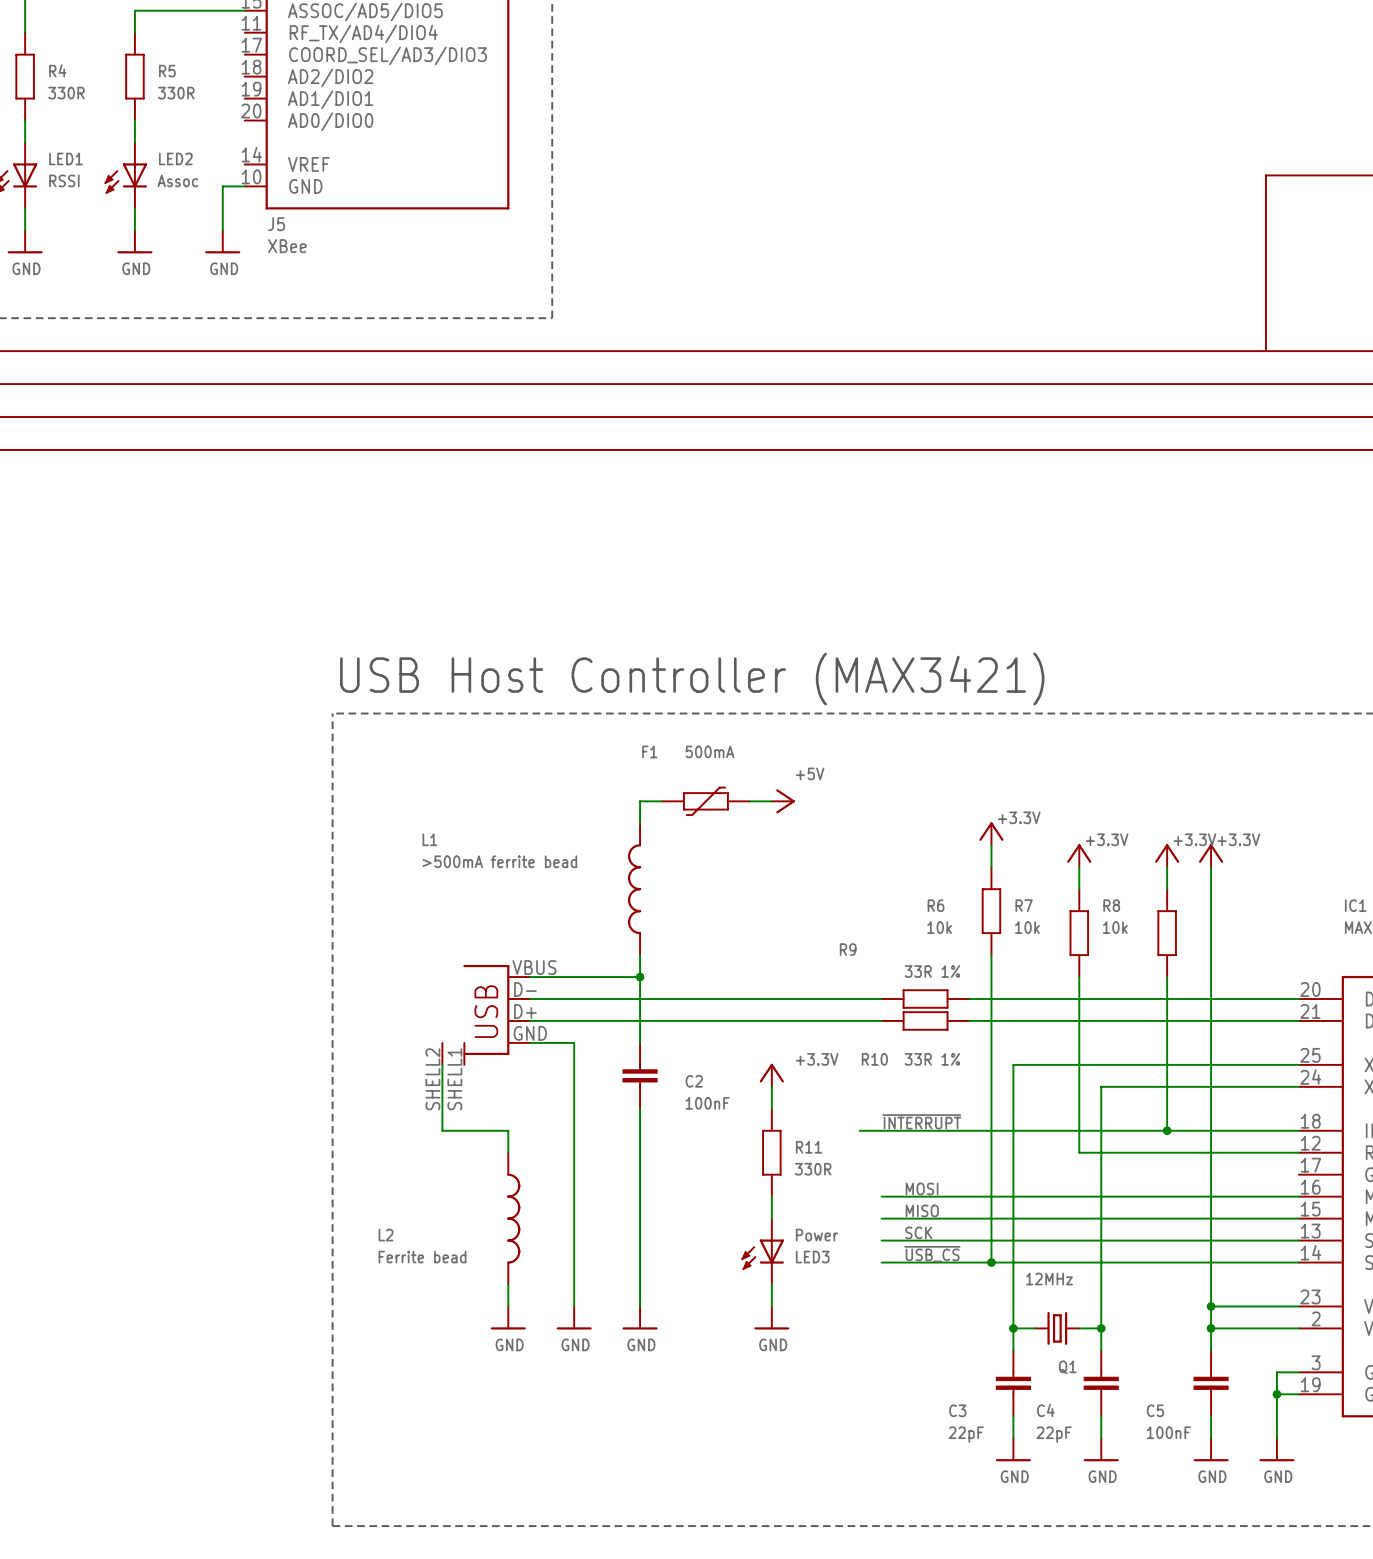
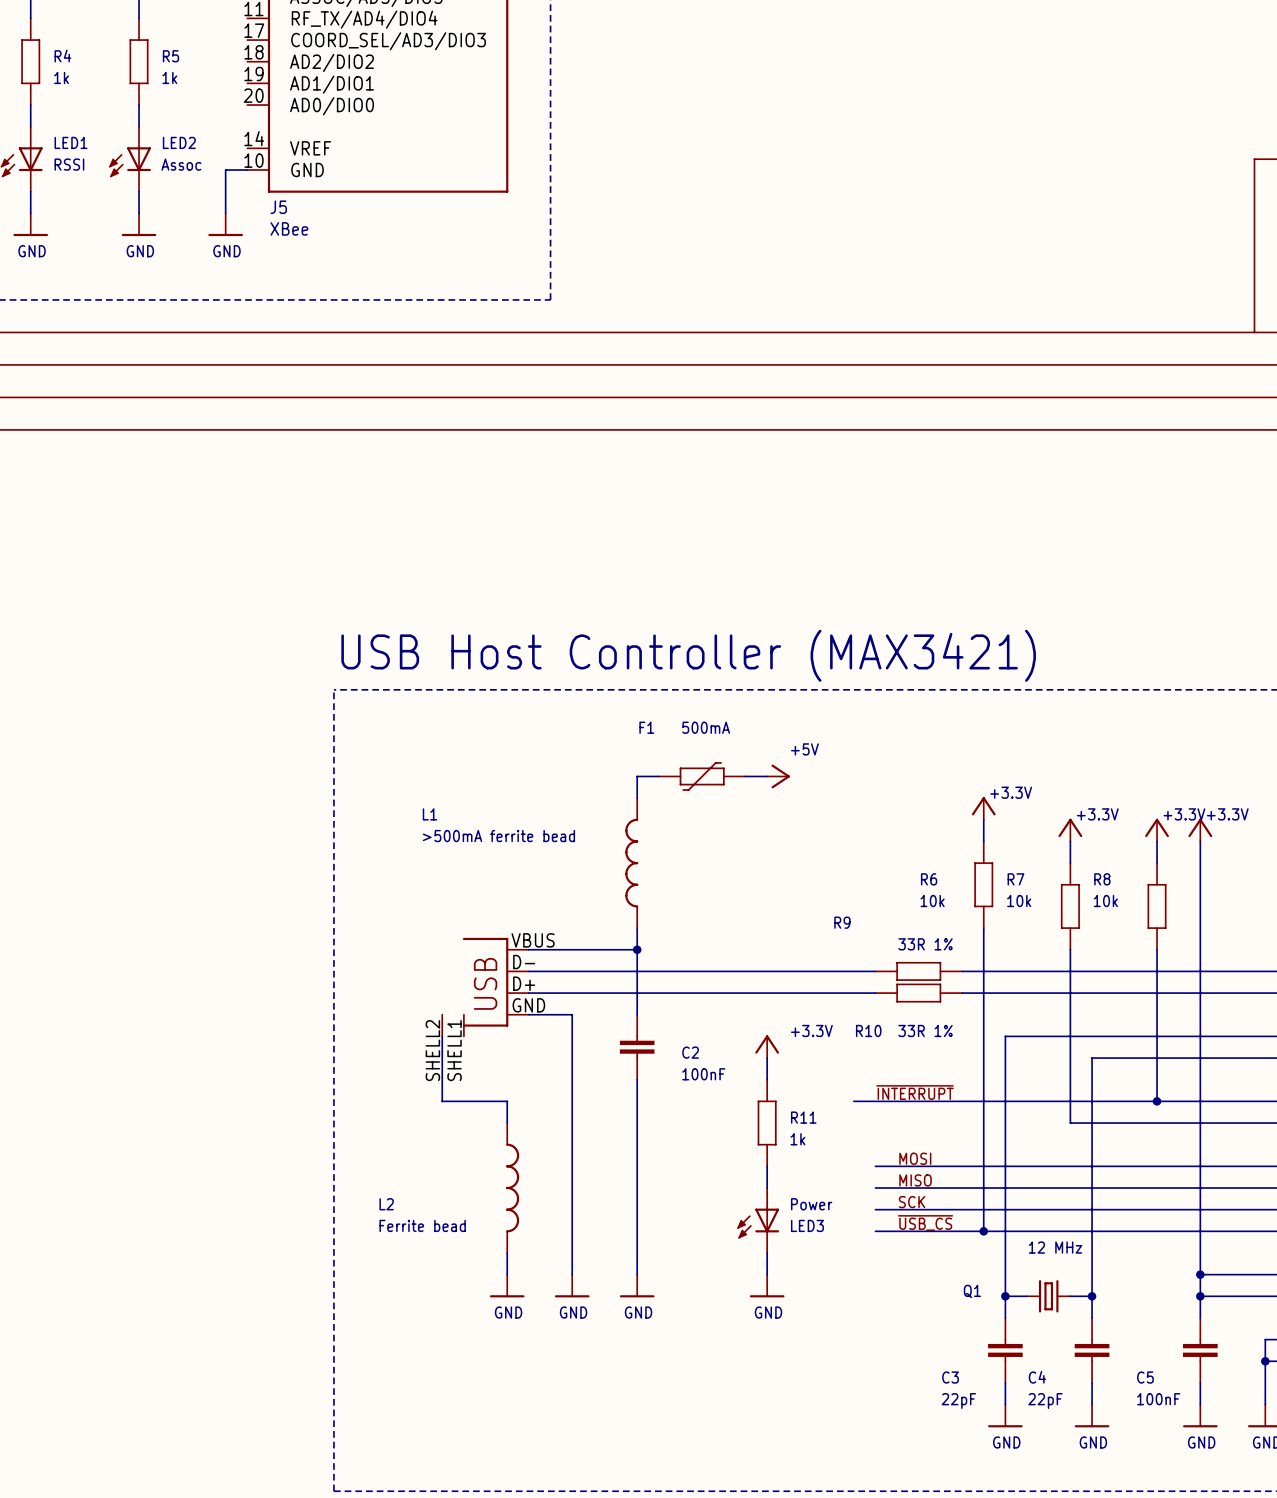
R4 value: 330R (66, 93) -> 1k (61, 77)
R5 value: 330R (176, 93) -> 1k (169, 77)
R11 value: 330R (813, 1169) -> 1k (797, 1139)
Q1 value: 12MHz (1049, 1279) -> 12 MHz (1055, 1247)
Q1 name position: Q1 (1067, 1367) -> Q1 (972, 1291)

